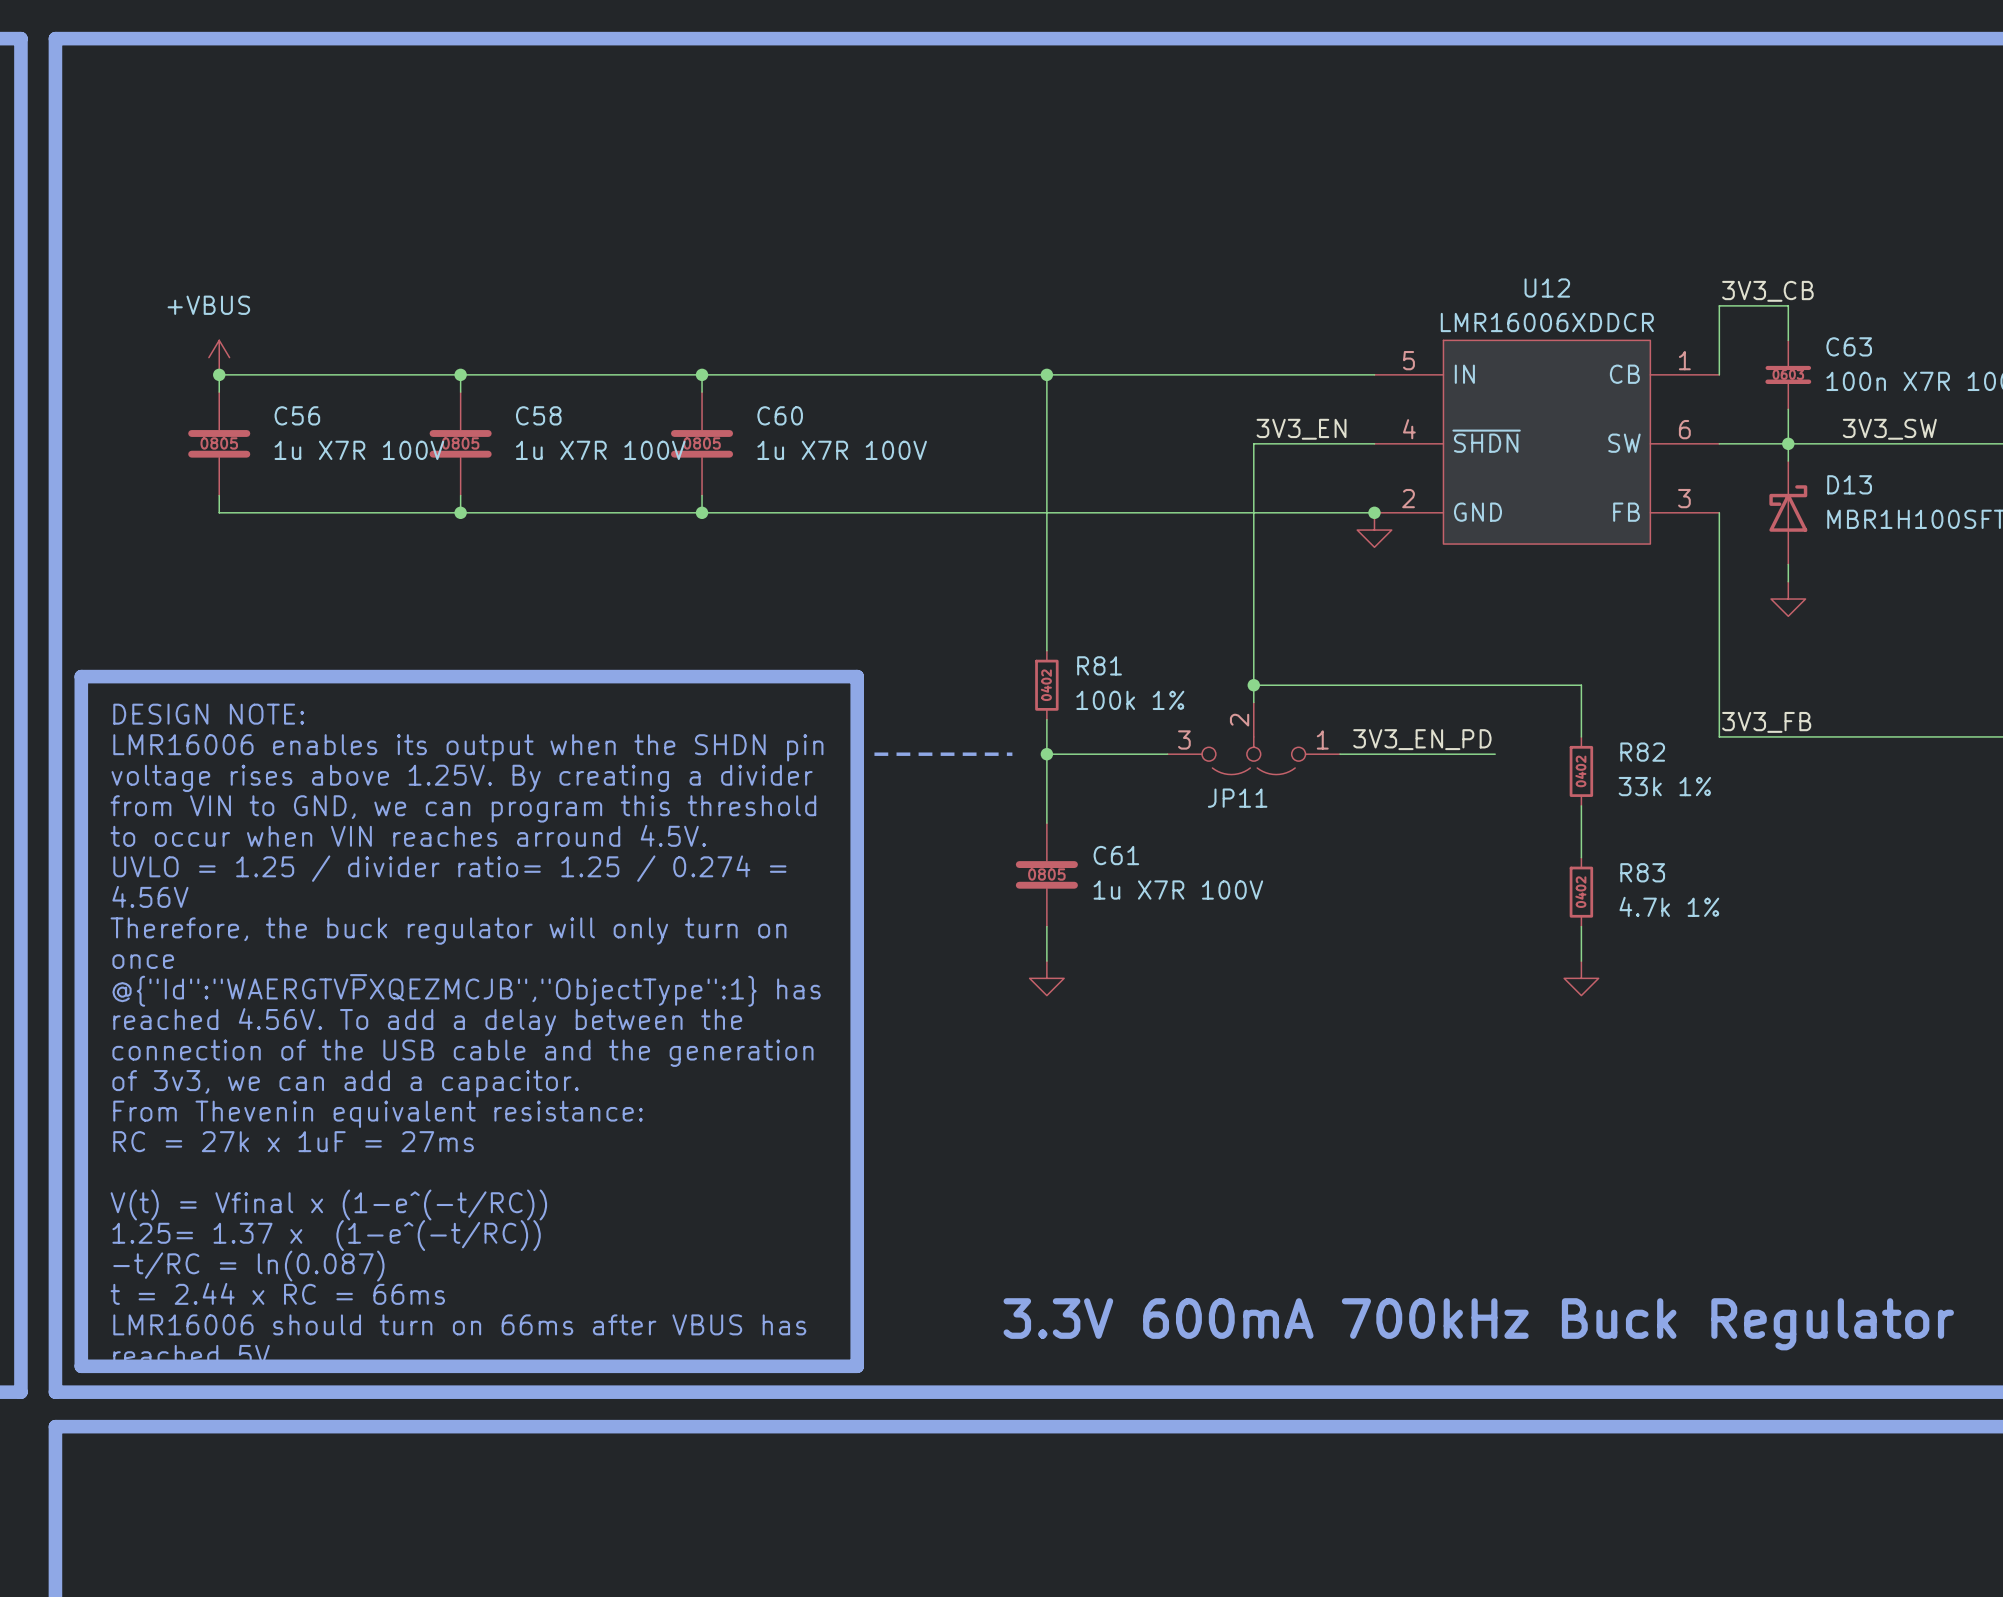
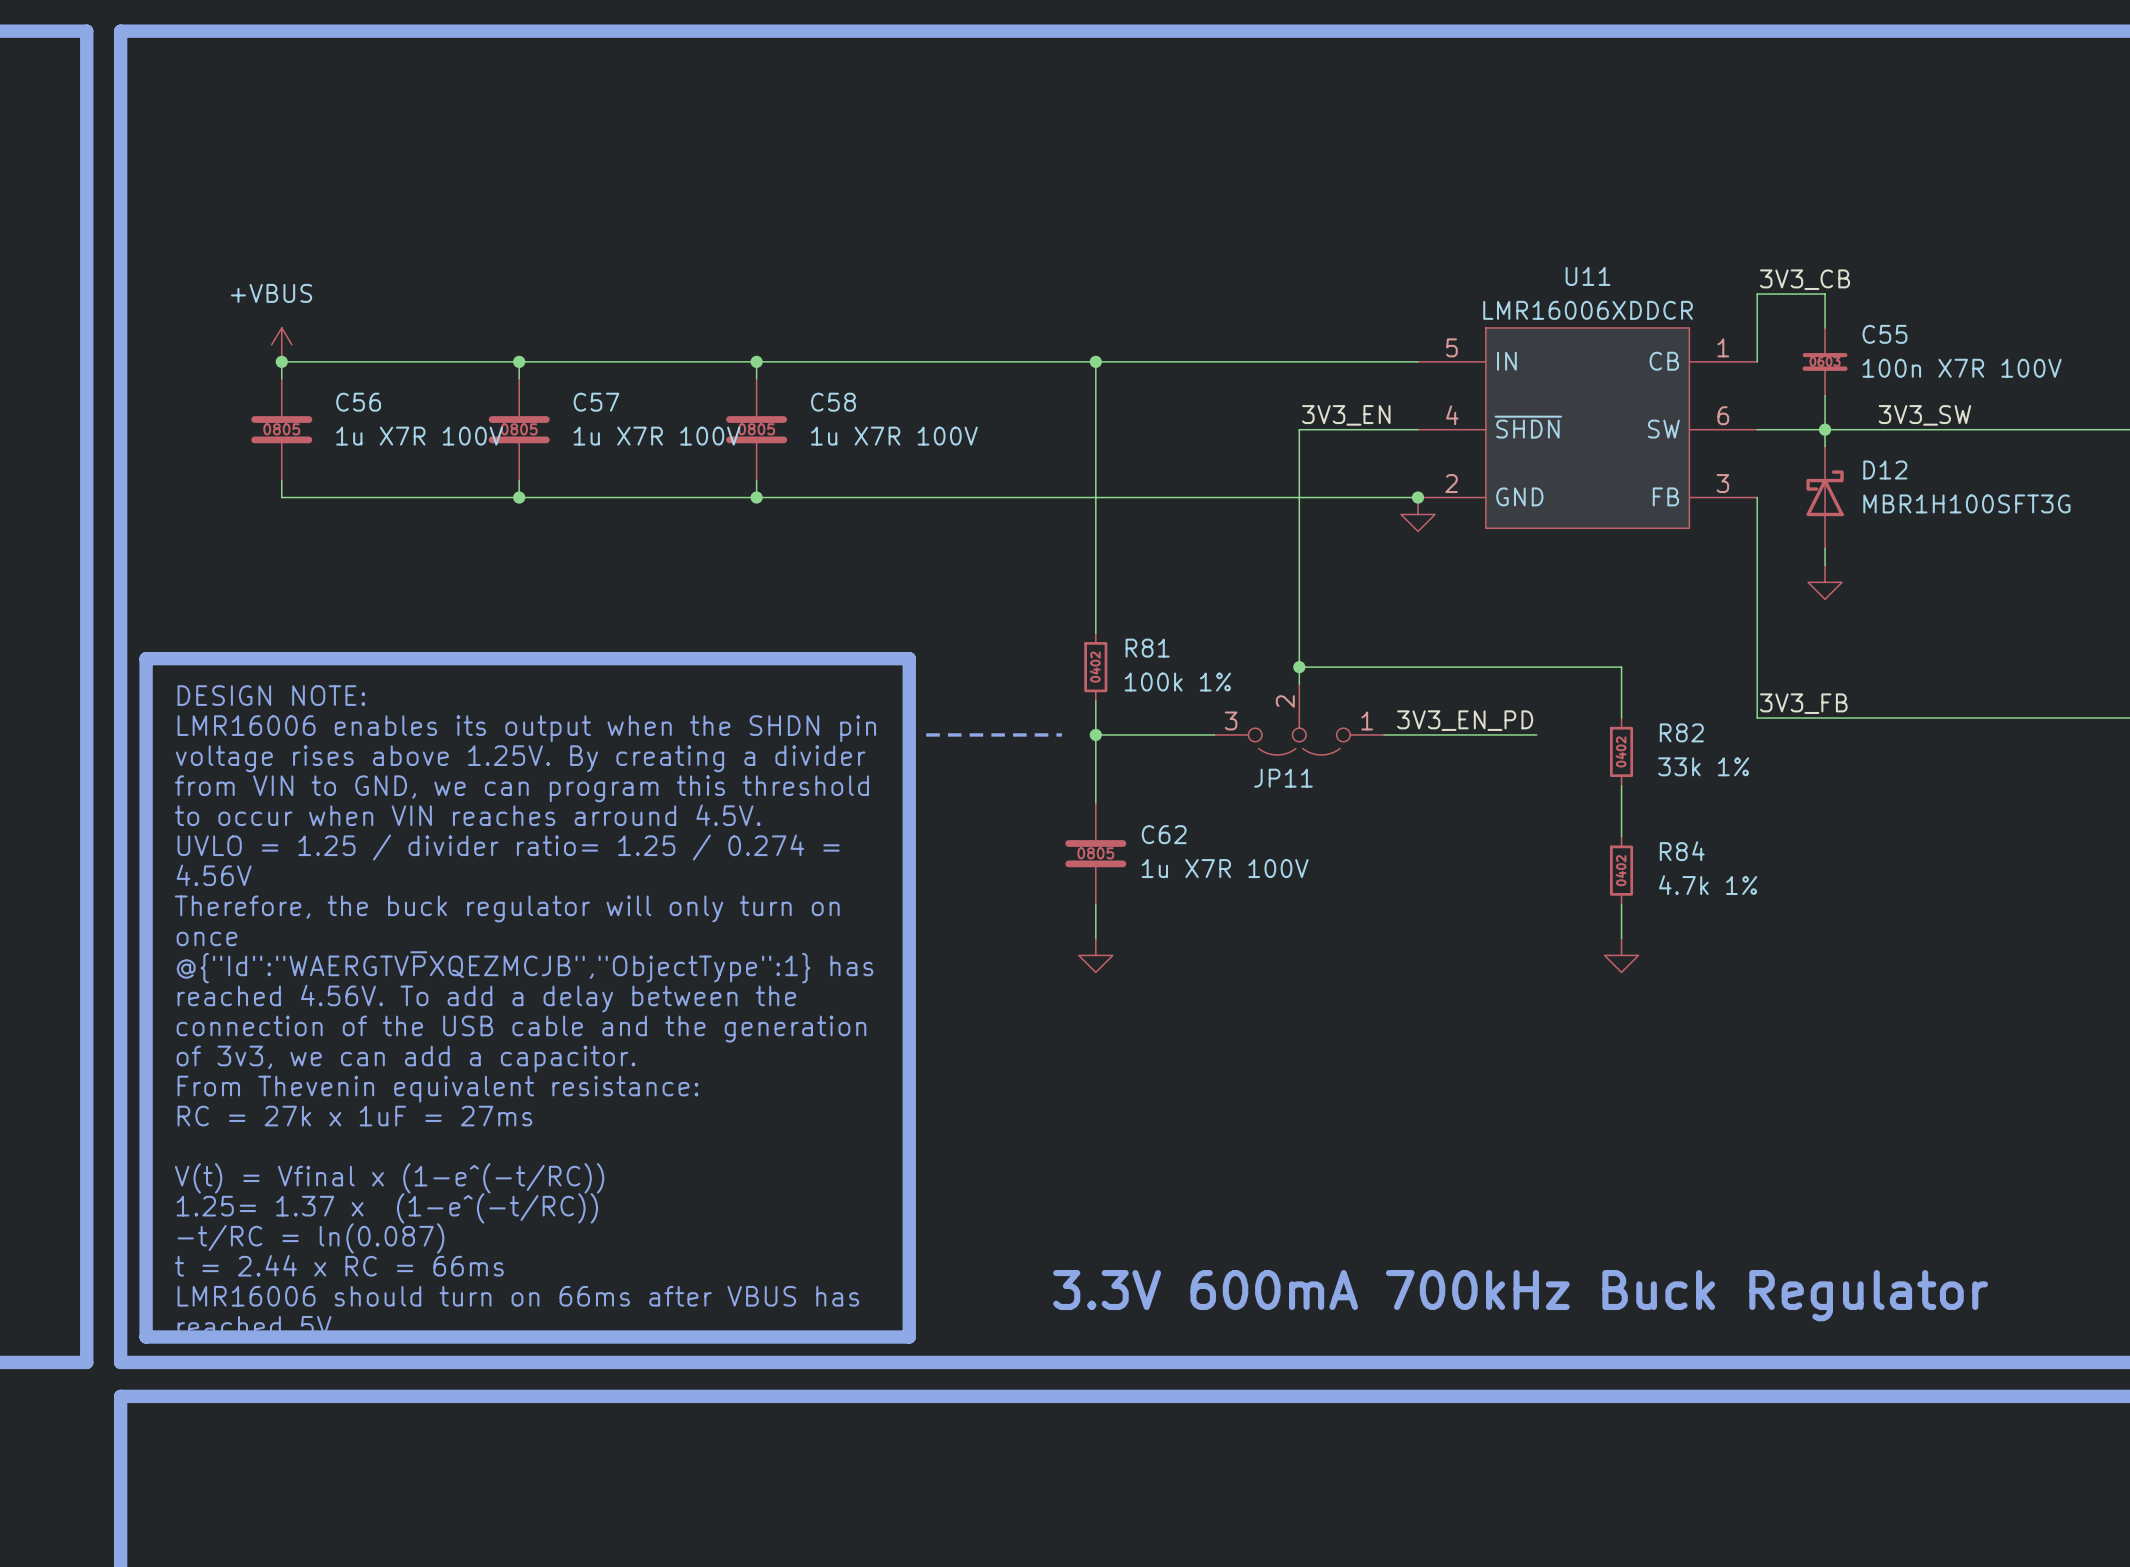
U12 name: U12 (1547, 288) -> U11 (1588, 276)
C63 name: C63 (1849, 346) -> C55 (1884, 334)
C58 name: C58 (538, 415) -> C57 (596, 402)
C60 name: C60 (780, 415) -> C58 (833, 402)
D13 name: D13 (1849, 484) -> D12 (1885, 470)
C61 name: C61 (1116, 855) -> C62 (1164, 834)
R83 name: R83 (1642, 872) -> R84 (1682, 851)

